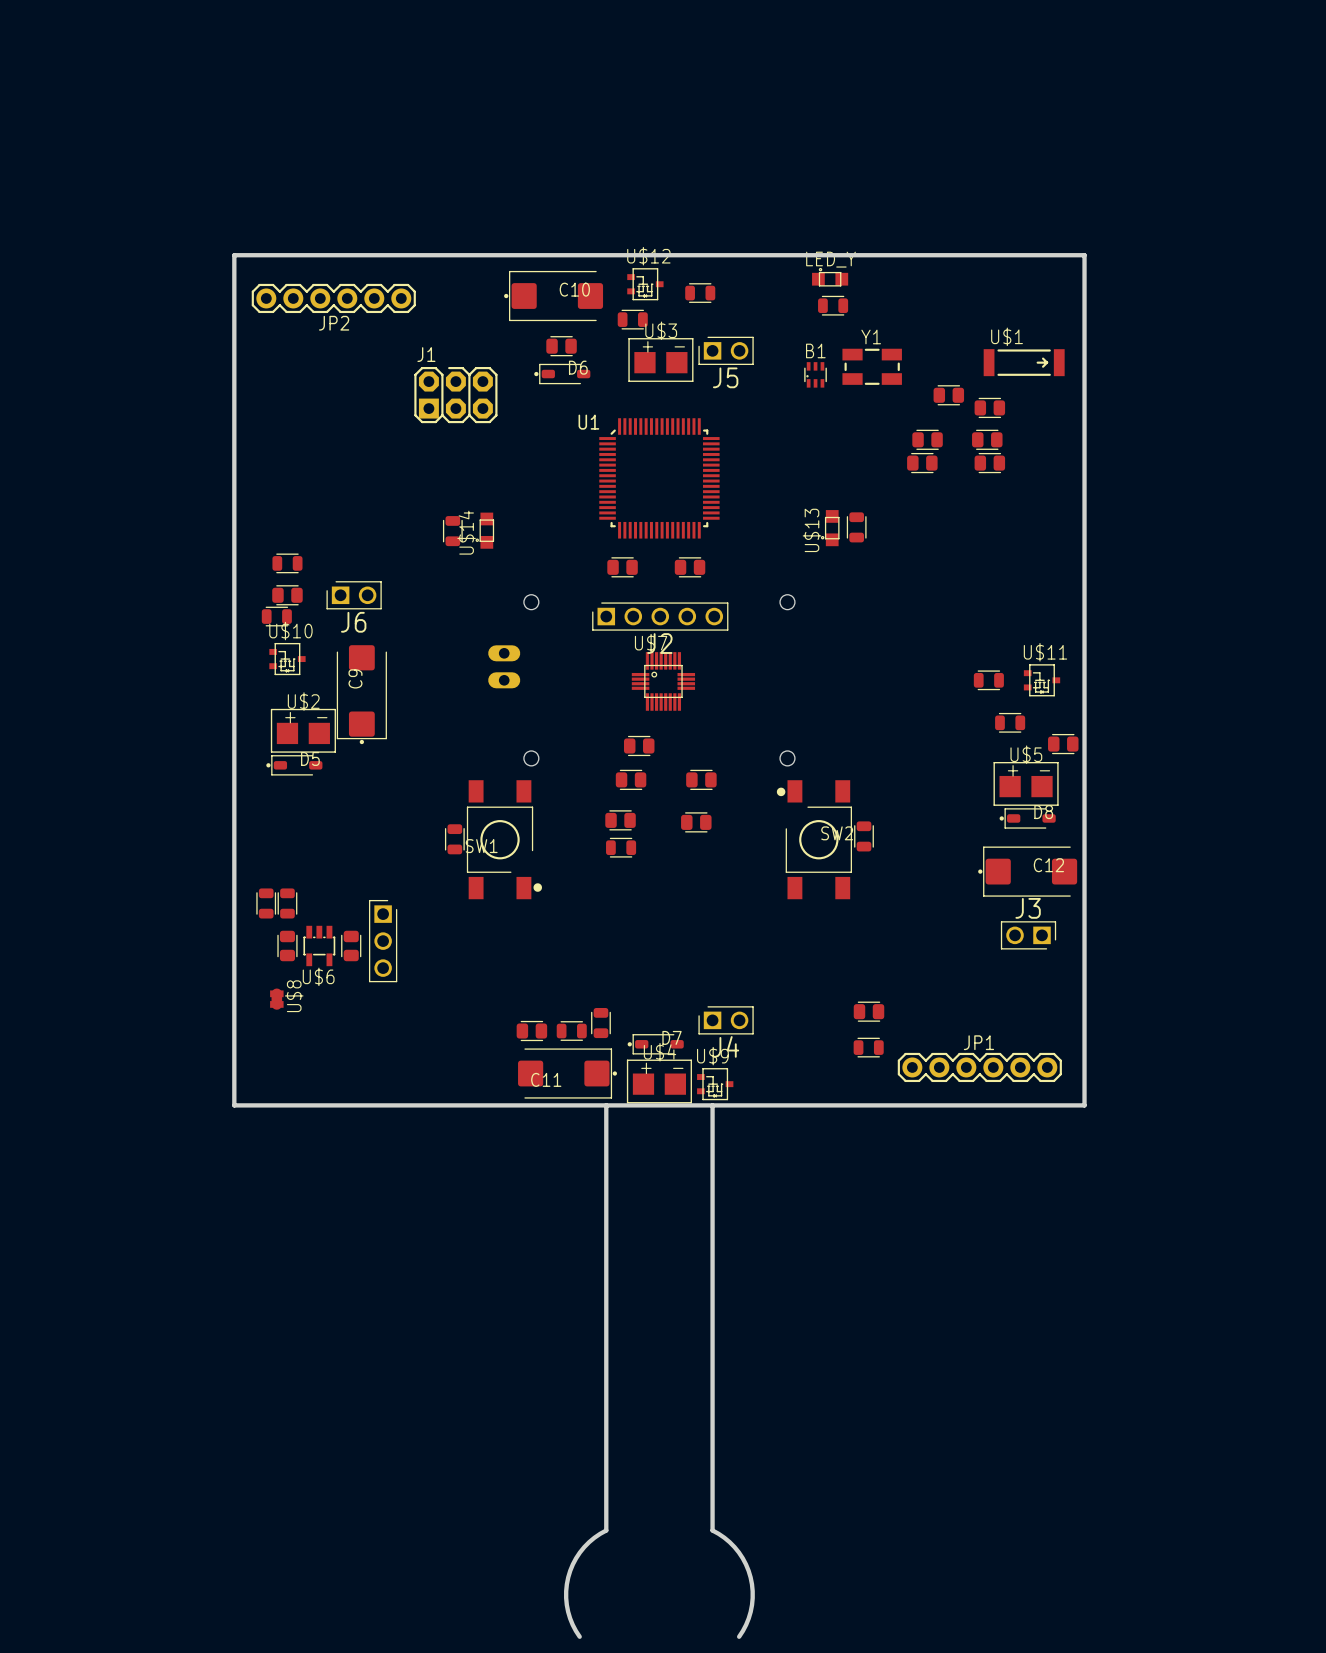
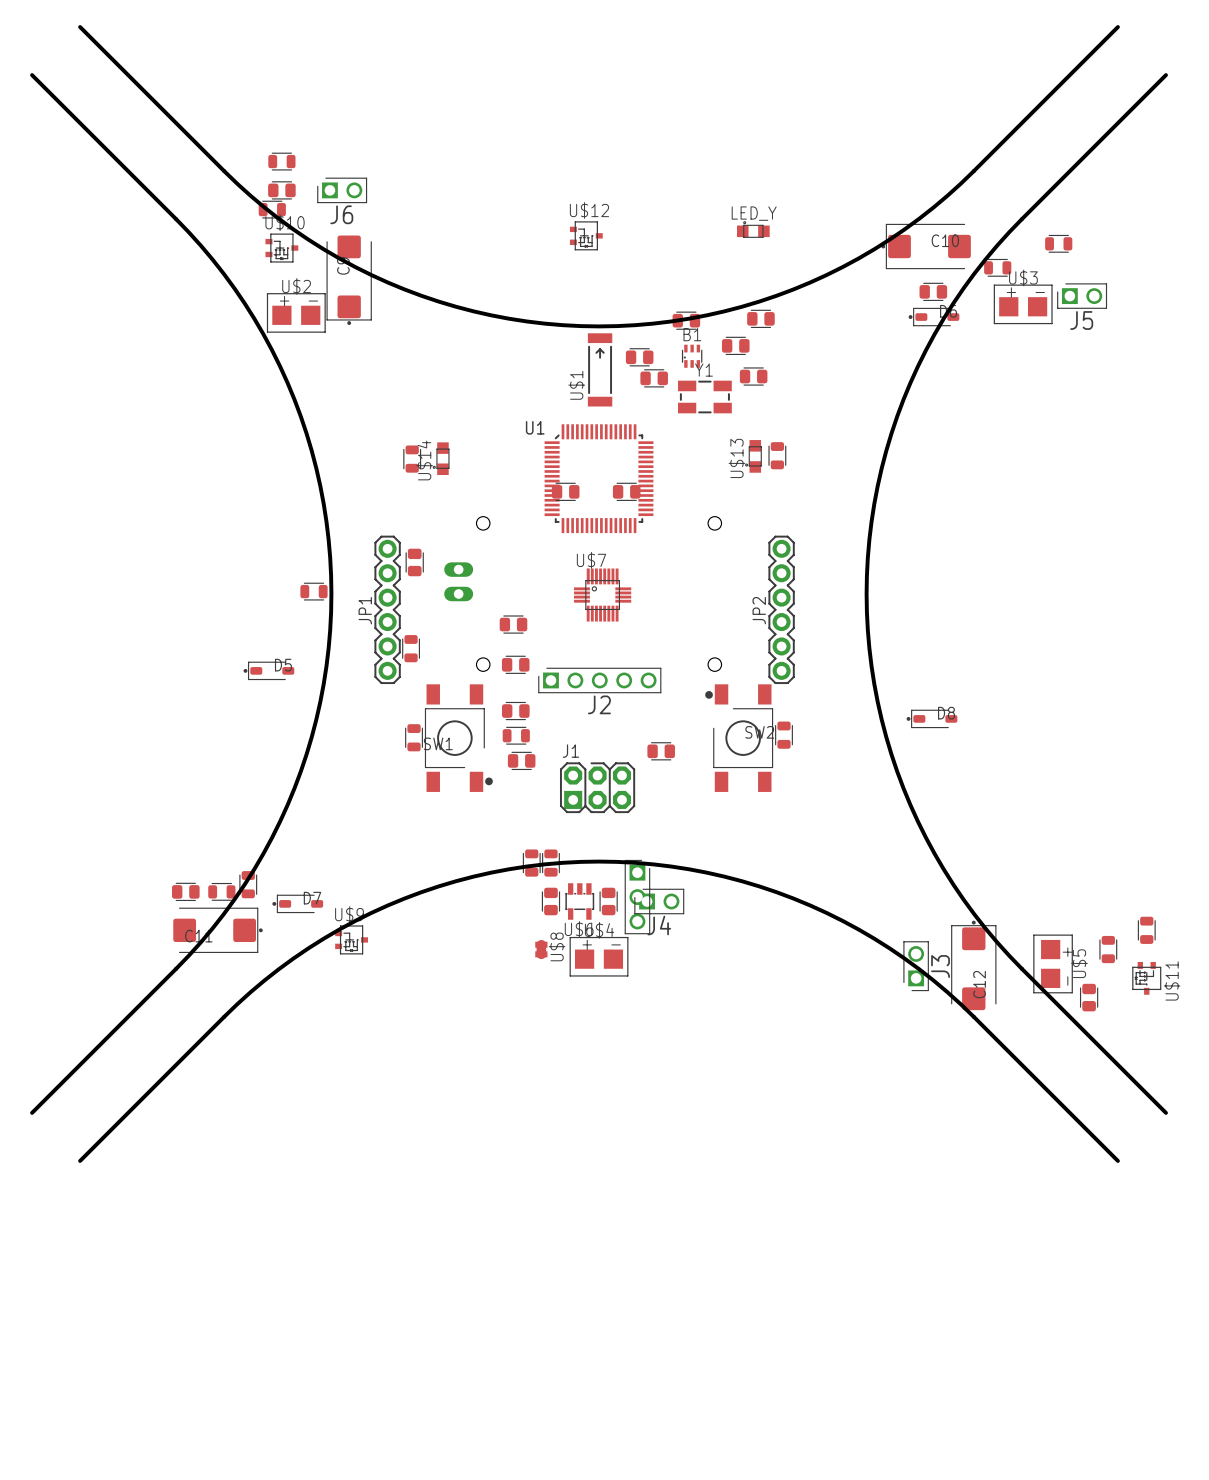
board edge: none -> (80, 27) (250, 195) (293, 229) (339, 258) (387, 282) (456, 306) (526, 321) (599, 326) (671, 321) (742, 306) (810, 282) (858, 258) (904, 229) (947, 195) (1117, 27)
board edge: none -> (32, 75) (200, 245) (234, 288) (263, 334) (287, 382) (311, 451) (326, 521) (331, 593) (326, 666) (311, 736) (287, 805) (263, 853) (234, 899) (200, 942) (32, 1112)
board edge: none -> (1165, 75) (997, 245) (963, 288) (934, 334) (910, 382) (886, 451) (871, 521) (866, 593) (871, 666) (886, 736) (910, 805) (934, 853) (963, 899) (997, 942) (1165, 1112)
part: none -> (281, 161)
part: none -> (281, 190)
board edge: (234, 255) (1084, 255) (1084, 1105) (234, 1105) (234, 255) -> none
part: none -> (272, 209)
part: (700, 293) -> none
part: none -> (1058, 243)
C10 position: (553, 296) -> (926, 246)
JP2 rotation: 0° (333, 298) -> 90° clockwise (781, 609)
JP2 position: (333, 298) -> (781, 609)
part: (833, 305) -> none
part: (632, 319) -> none
part: none -> (997, 267)
part: (561, 346) -> none
part: none -> (933, 291)
J5 position: (726, 350) -> (1082, 296)
U$3 position: (660, 360) -> (1023, 304)
U$1 rotation: 0° (1024, 362) -> 90° counterclockwise (600, 369)
U$1 position: (1024, 362) -> (600, 369)
Y1 position: (872, 366) -> (704, 396)
D6 position: (562, 374) -> (934, 317)
B1 position: (815, 374) -> (692, 356)
part: none -> (760, 318)
part: none -> (686, 320)
J1 position: (455, 395) -> (597, 787)
part: (948, 395) -> none
part: none -> (735, 345)
part: (989, 407) -> none
part: none -> (639, 357)
part: none -> (753, 376)
part: (927, 439) -> none
part: (987, 439) -> none
part: none -> (654, 378)
part: (922, 463) -> none
part: (989, 463) -> none
U1 position: (659, 478) -> (599, 478)
part: (287, 563) -> none
part: (287, 595) -> none
J6 position: (354, 595) -> (342, 190)
part: (276, 616) -> none
J2 position: (660, 616) -> (599, 680)
part: none -> (414, 562)
U$10 position: (287, 659) -> (281, 248)
part: none -> (314, 591)
part: (988, 680) -> none
U$11 rotation: 0° (1042, 680) -> 90° clockwise (1146, 978)
U$11 position: (1042, 680) -> (1146, 978)
C9 position: (361, 694) -> (349, 280)
part: none -> (513, 624)
part: (1010, 722) -> none
U$2 position: (303, 730) -> (296, 312)
part: none -> (411, 648)
part: (1063, 744) -> none
part: (639, 745) -> none
U$5 name position: U$5 (1026, 754) -> U$5 (1079, 963)
part: none -> (515, 664)
U$5 footprint: [993, 761, 1059, 806] -> [1033, 934, 1073, 994]
part: (631, 779) -> none
part: (701, 779) -> none
part: none -> (515, 711)
part: (620, 820) -> none
part: (696, 822) -> none
part position: (621, 847) -> (516, 735)
part: none -> (661, 751)
part: none -> (521, 760)
C12 rotation: 0° (1027, 871) -> 90° clockwise (973, 965)
C12 position: (1027, 871) -> (973, 965)
part: (266, 903) -> none
part: (287, 903) -> none
J3 rotation: 0° (1028, 935) -> 90° clockwise (916, 966)
J3 position: (1028, 935) -> (916, 966)
part: (383, 941) -> none
part: (287, 945) -> none
U$6 position: (319, 945) -> (579, 901)
part: (351, 945) -> none
part: none -> (531, 863)
part: none -> (550, 863)
U$8 position: (276, 999) -> (541, 949)
part: none -> (248, 884)
part footprint: [591, 1008, 611, 1039] -> [541, 887, 561, 916]
part: none -> (185, 891)
part: none -> (221, 891)
part: (869, 1011) -> none
part: none -> (637, 897)
part: none -> (608, 901)
part: (531, 1031) -> none
part: (571, 1031) -> none
JP1 name position: JP1 (978, 1042) -> JP1 (365, 610)
D7 position: (655, 1044) -> (297, 903)
part: (868, 1047) -> none
part: none -> (1146, 930)
JP1 rotation: 0° (979, 1067) -> 90° clockwise (387, 609)
JP1 position: (979, 1067) -> (387, 609)
C11 position: (567, 1073) -> (218, 930)
part: none -> (1108, 949)
U$9 position: (715, 1084) -> (351, 939)
board edge: (606, 1105) (606, 1530) (594, 1537) (579, 1552) (568, 1577) (566, 1604) (572, 1624) (579, 1636) -> none
board edge: (712, 1105) (712, 1530) (724, 1537) (738, 1552) (750, 1577) (752, 1604) (746, 1624) (739, 1636) -> none
part: none -> (1089, 997)
board edge: none -> (80, 1160) (250, 992) (293, 958) (339, 929) (387, 905) (456, 881) (526, 866) (599, 861) (671, 866) (742, 881) (810, 905) (858, 929) (904, 958) (947, 992) (1117, 1160)

